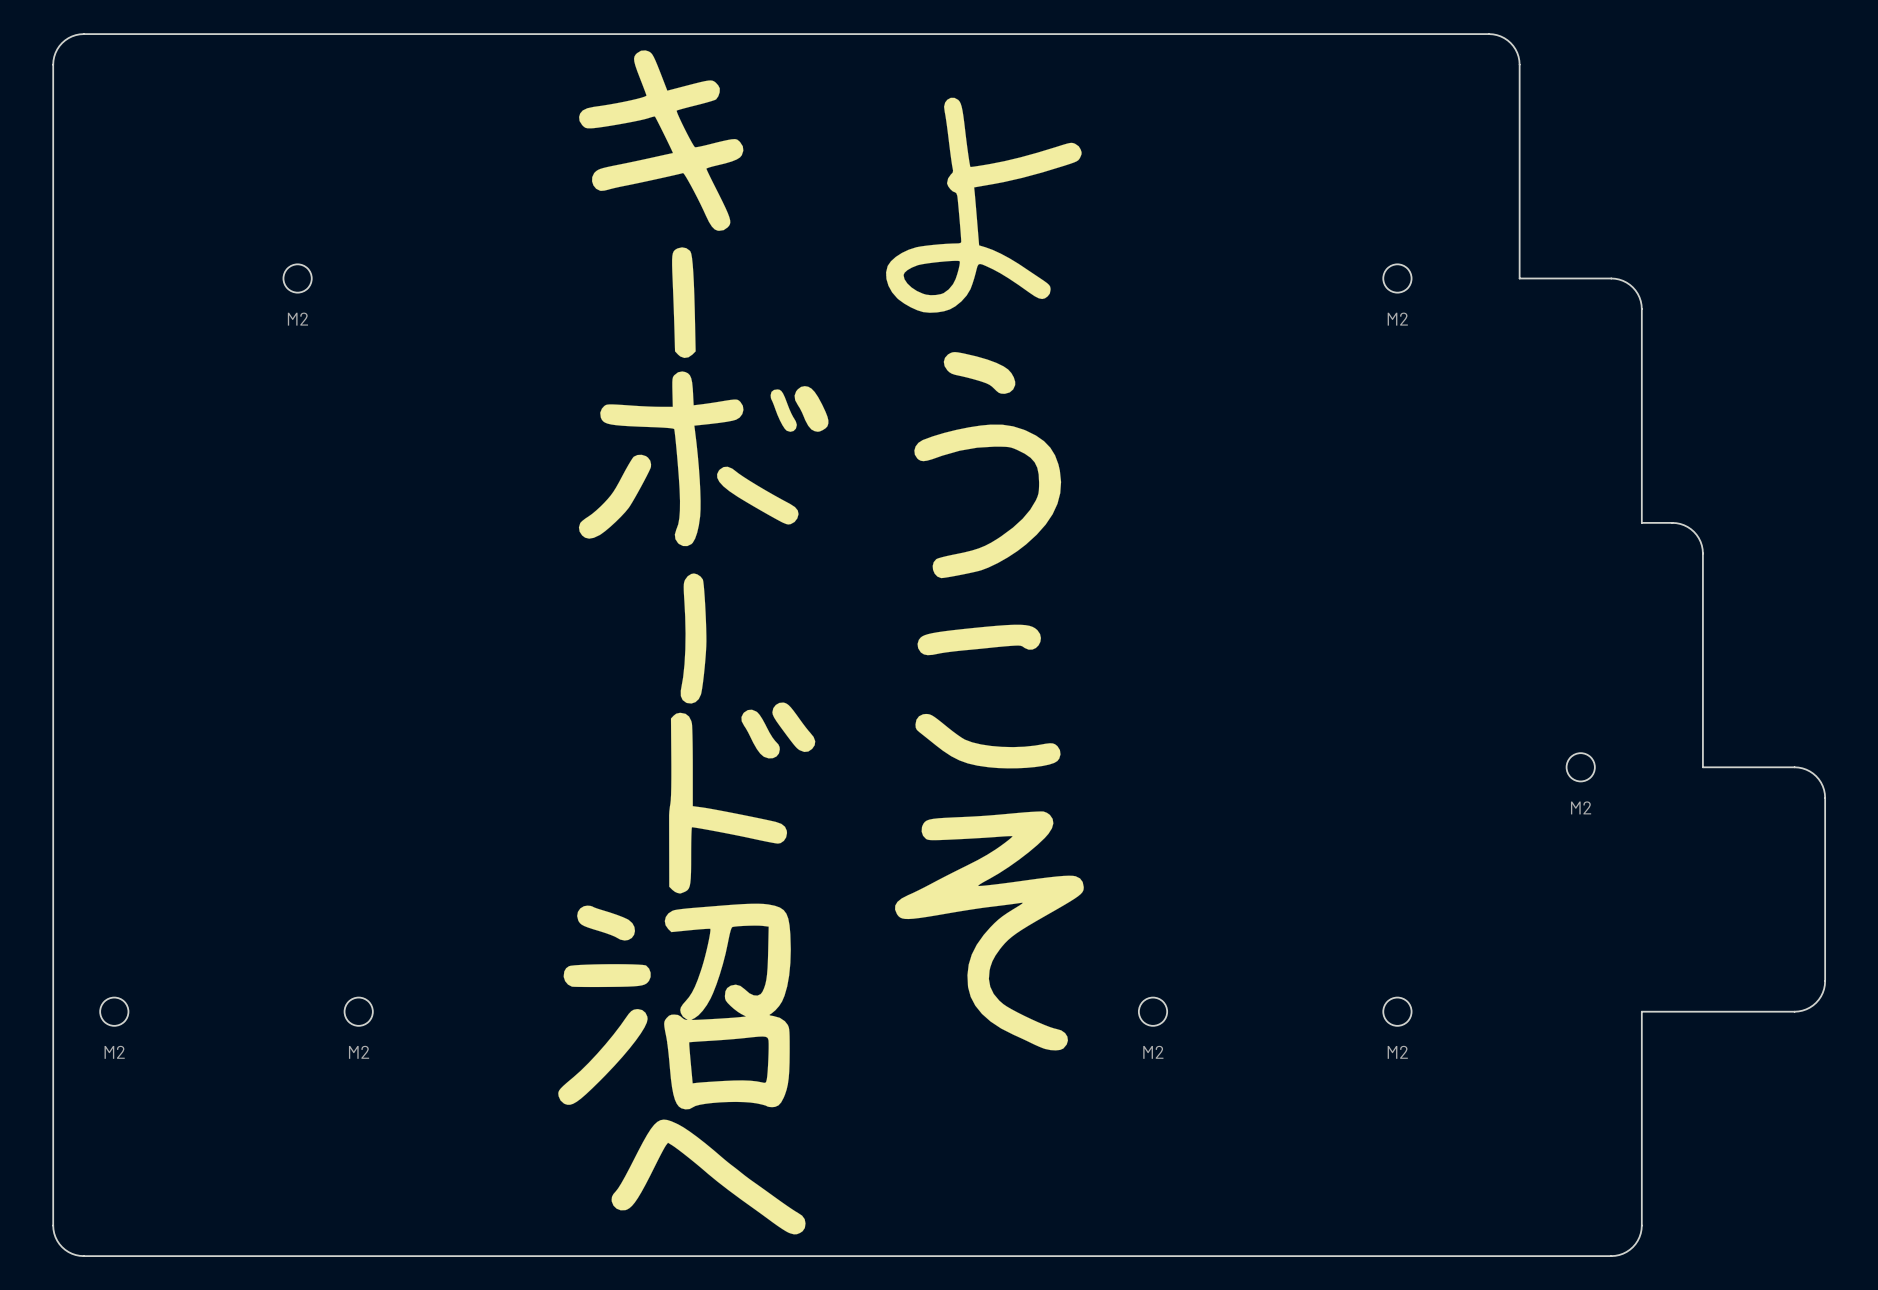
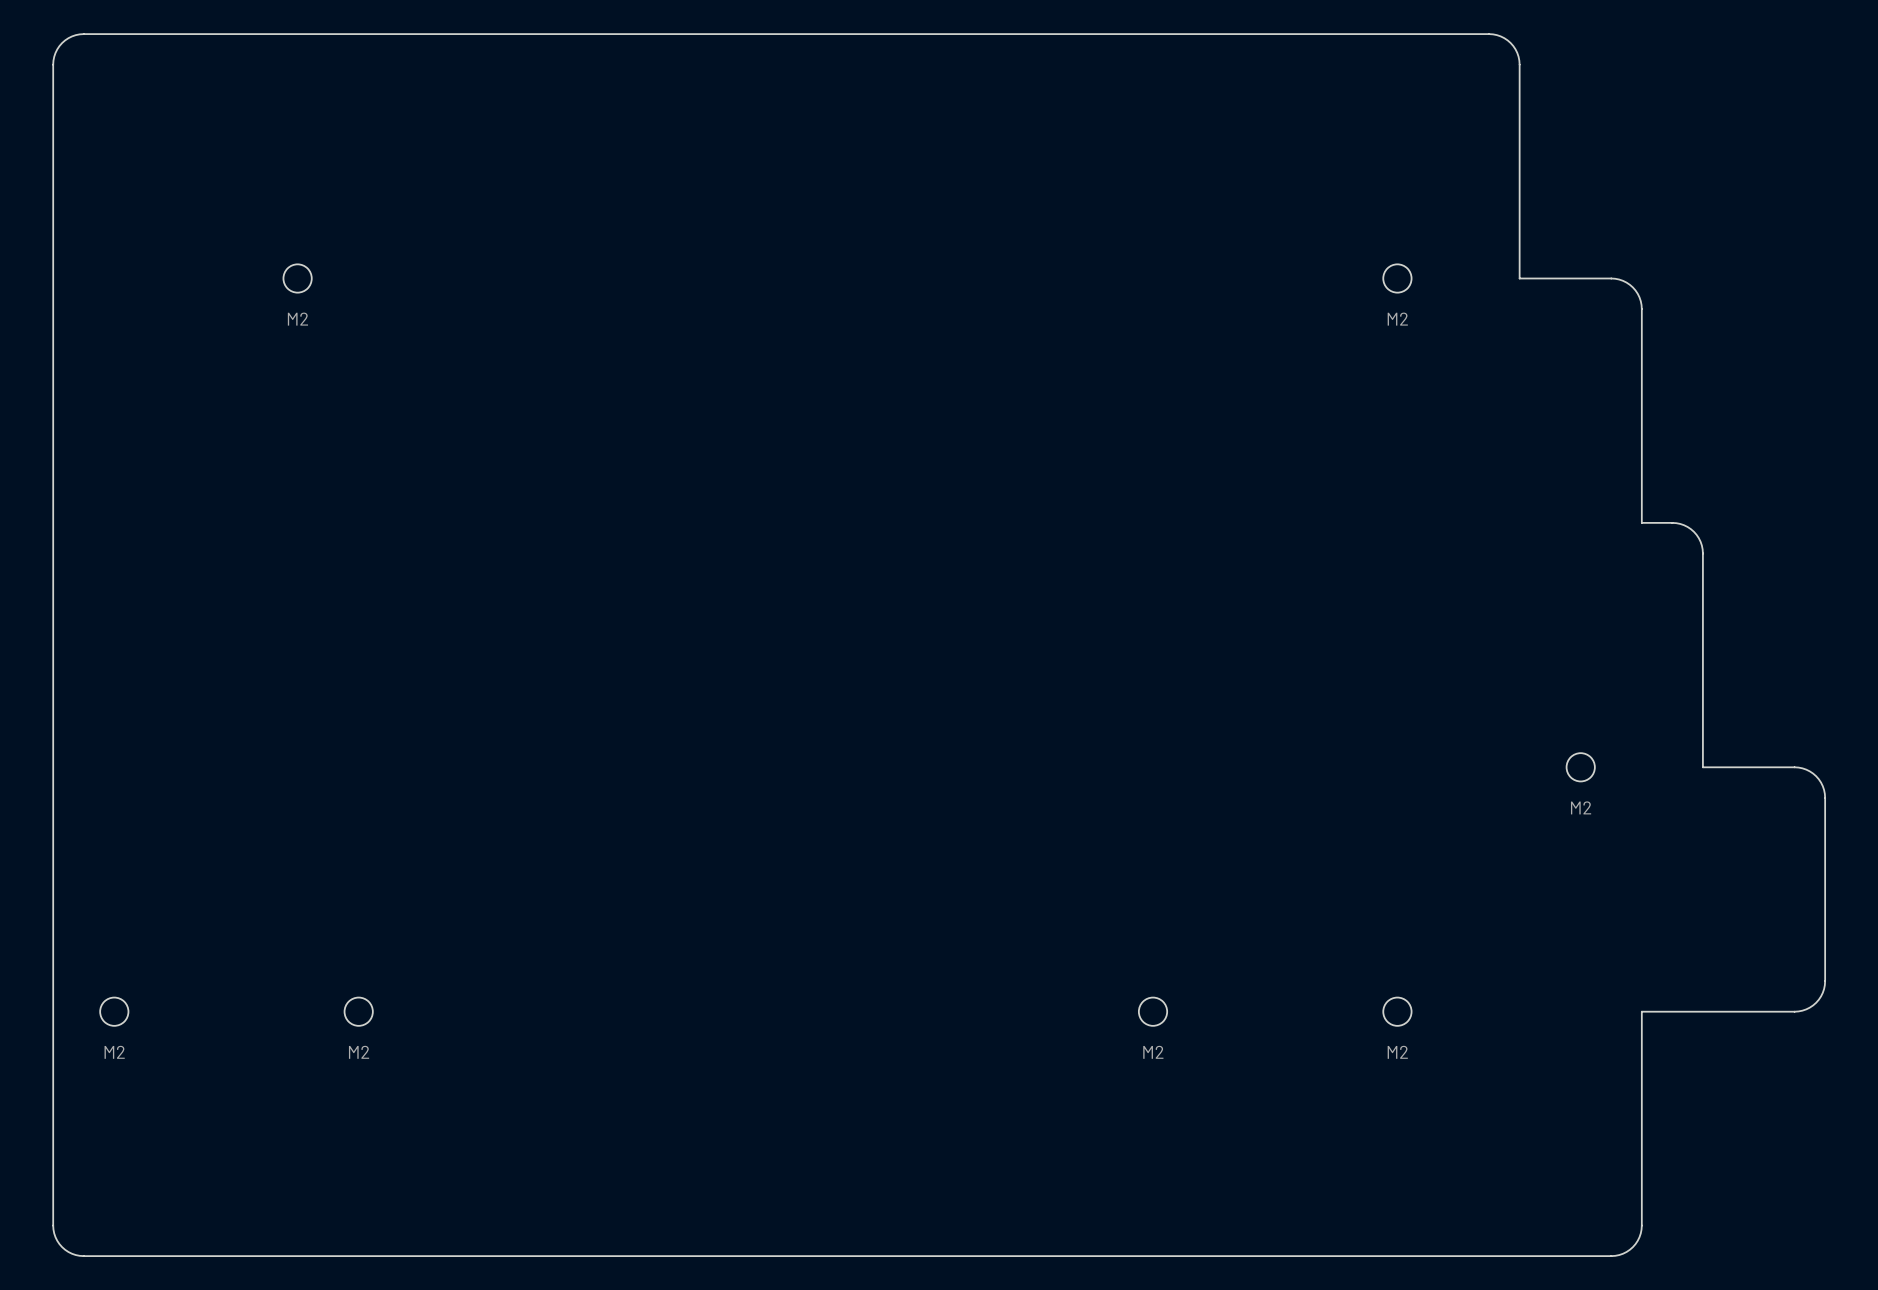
drawing: [558, 50, 1084, 1235] -> none

